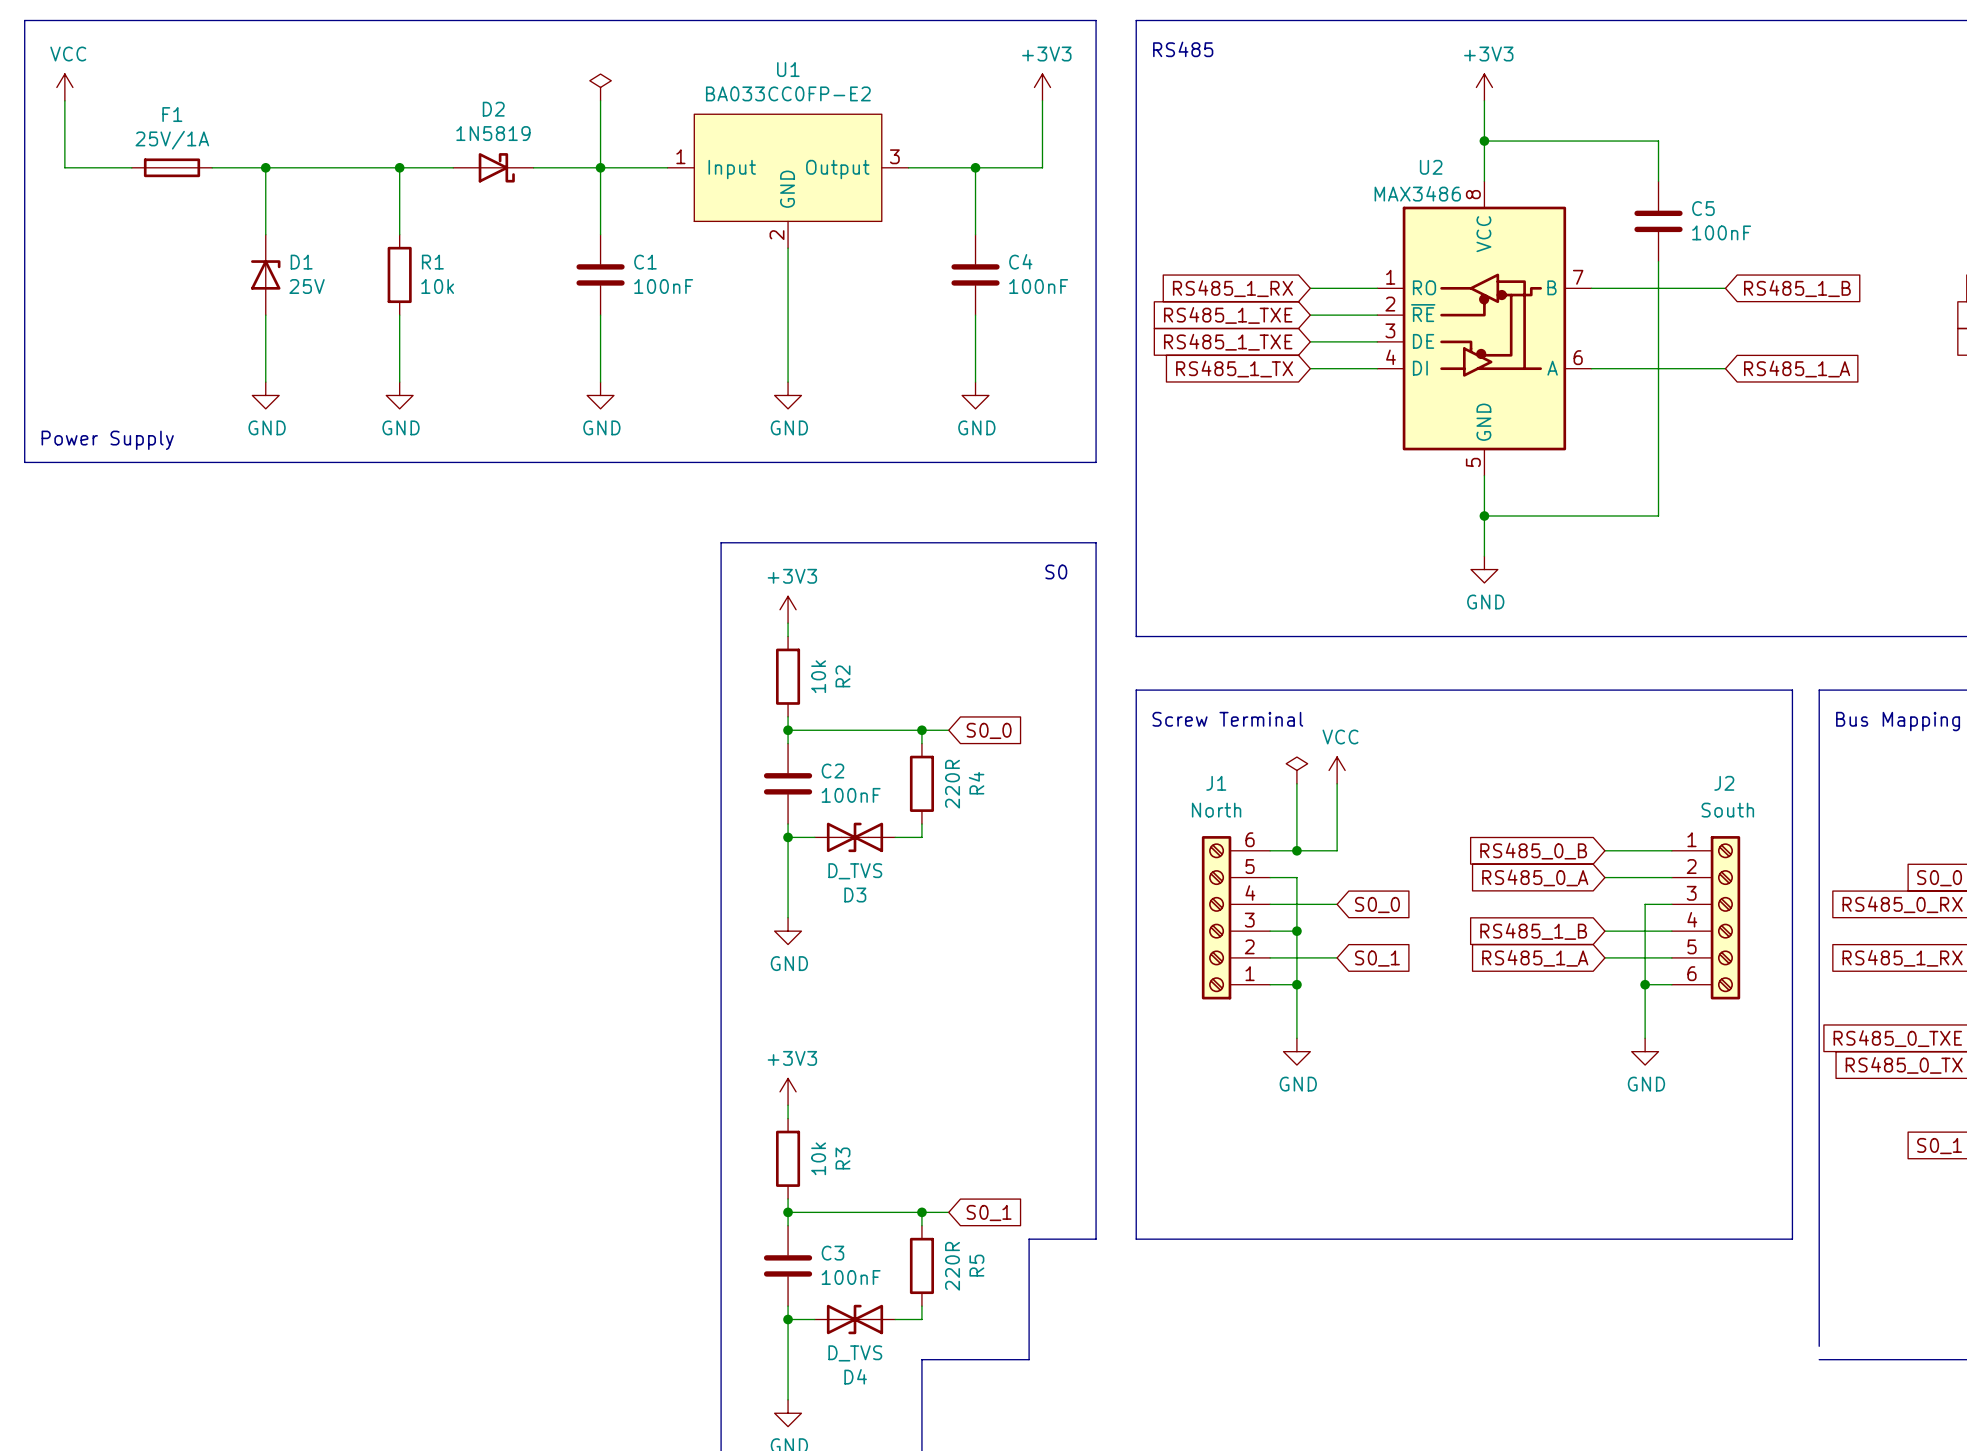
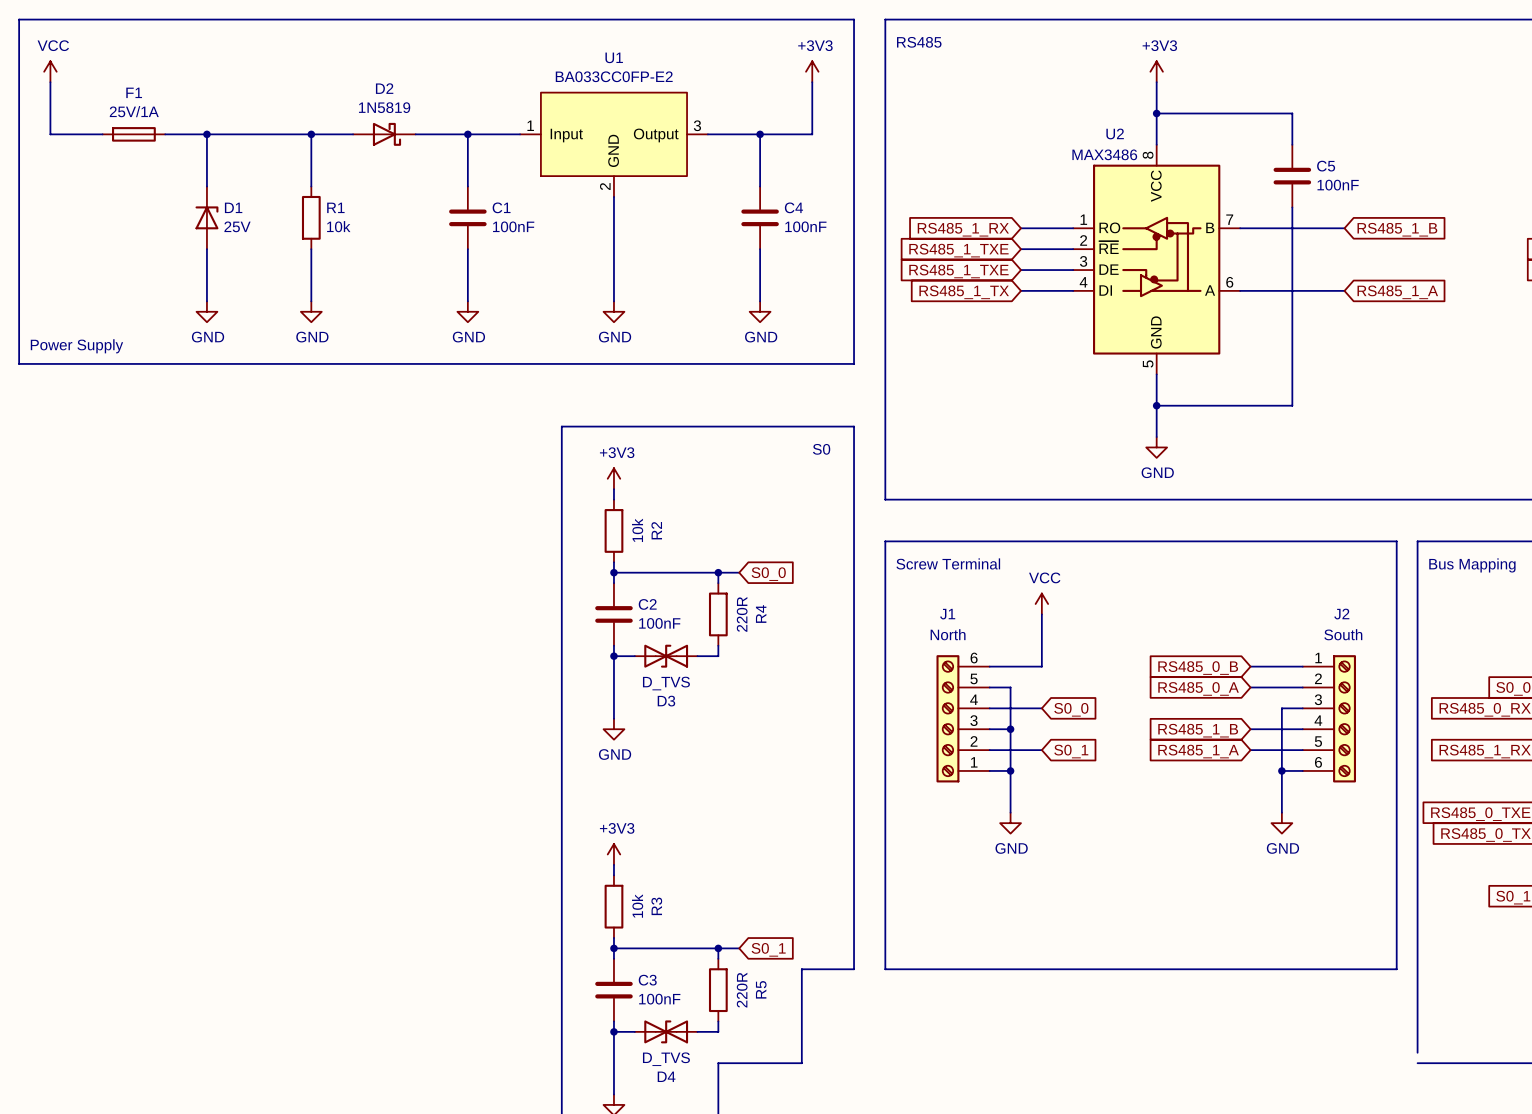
power symbol: (600, 87) -> none
wire: (600, 100) (600, 167) -> none
power symbol: (1296, 770) -> none
wire: (1296, 783) (1296, 850) -> none
junction: (1296, 850) -> none

